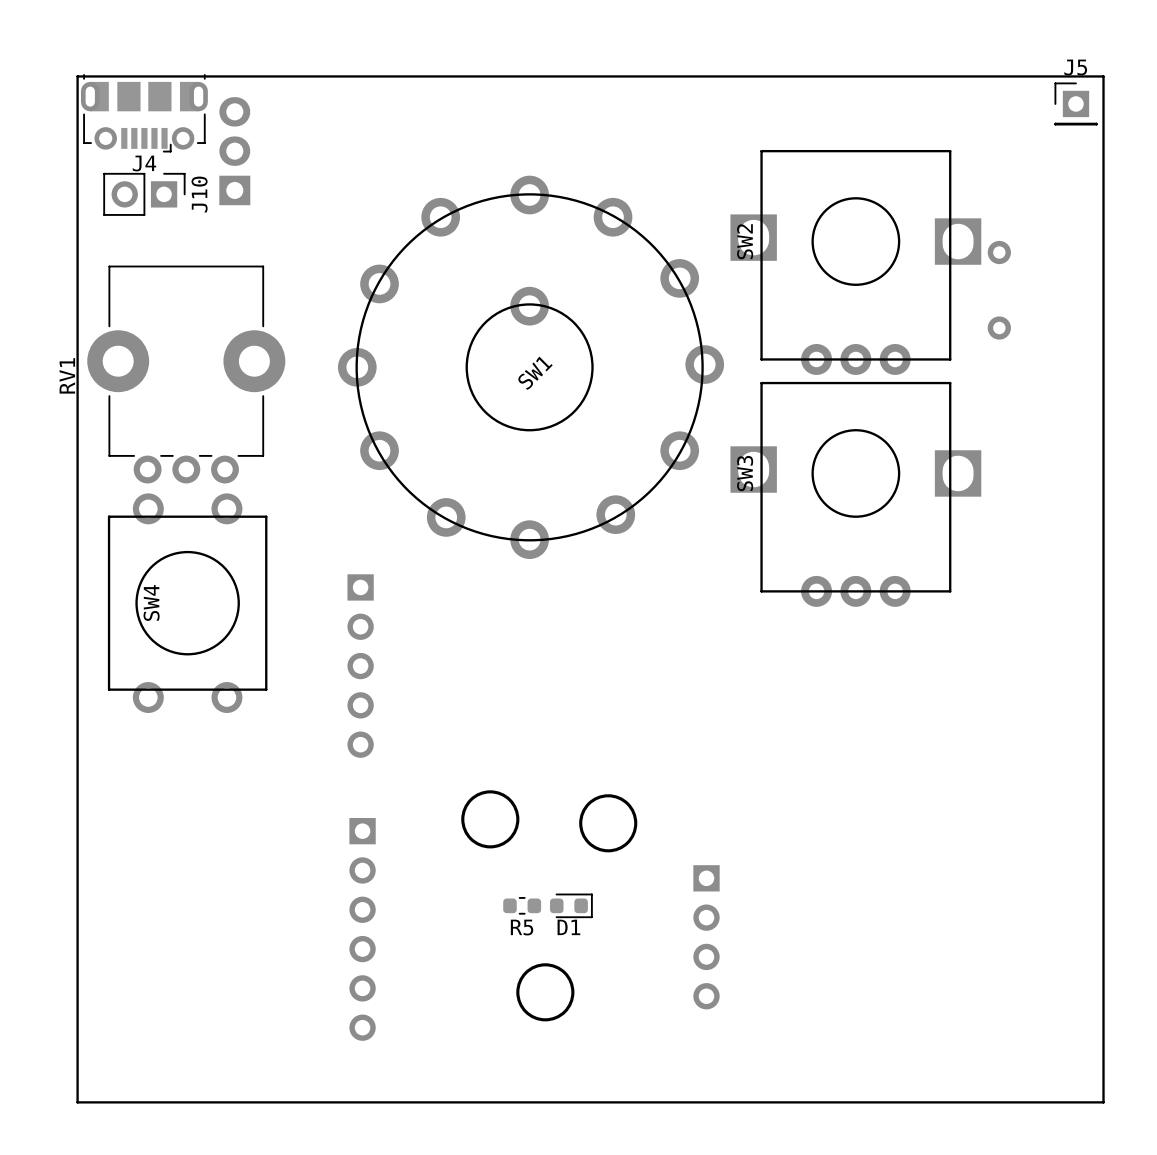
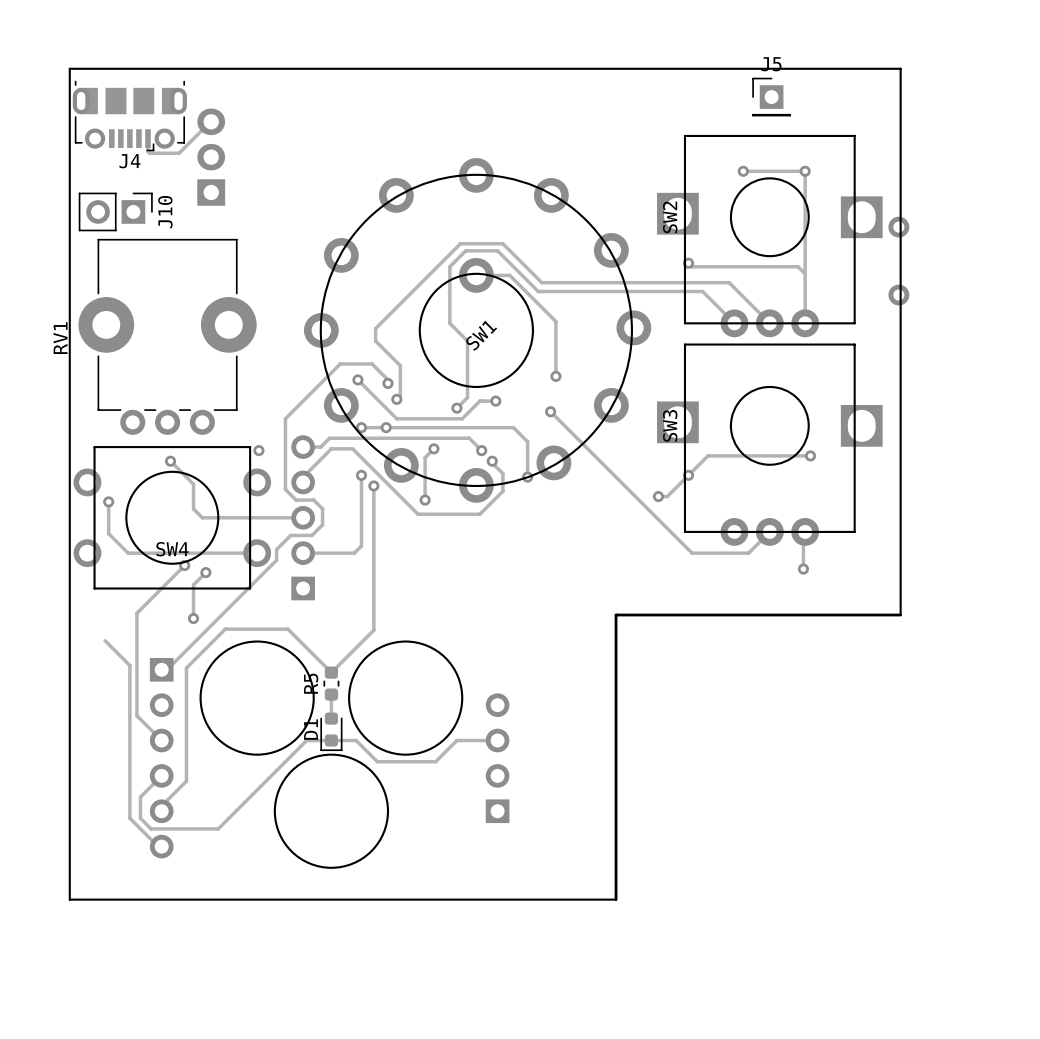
board edge: (1001, 76) (1103, 76) (1103, 1102) (77, 1102) (77, 1000) -> (900, 68) (900, 615) (616, 615) (616, 899) (69, 899)
J5 position: (1075, 103) -> (771, 97)
J4 position: (144, 113) -> (129, 116)
track: none -> (211, 121) (179, 153) (149, 153) (147, 151) (147, 138)
part position: (234, 151) -> (211, 157)
track: none -> (743, 171) (805, 171) (805, 323)
via: none -> (743, 171)
via: none -> (805, 171)
J10 position: (144, 194) -> (115, 211)
track: none -> (688, 263) (692, 266) (798, 266) (805, 273)
via: none -> (688, 263)
track: none -> (476, 275) (509, 275) (555, 321) (555, 376)
track: none -> (734, 323) (702, 291) (538, 291) (497, 250) (465, 250) (449, 266) (449, 323) (467, 341) (467, 397) (456, 408)
track: none -> (769, 323) (729, 282) (541, 282) (502, 243) (460, 243) (375, 328) (375, 341) (400, 365) (400, 395) (396, 399)
via: none -> (555, 376)
track: none -> (357, 379) (396, 418) (462, 418) (479, 401) (495, 401)
via: none -> (357, 379)
track: none -> (386, 381) (387, 383) (387, 379) (372, 363) (340, 363) (285, 418) (285, 489) (296, 500) (313, 500) (322, 508) (322, 524) (311, 535) (290, 535) (276, 549) (276, 560) (167, 669) (161, 669)
via: none -> (387, 383)
via: none -> (396, 399)
via: none -> (495, 401)
via: none -> (456, 408)
track: none -> (550, 411) (692, 553) (748, 553) (769, 531)
via: none -> (550, 411)
track: none -> (361, 427) (513, 427) (527, 441) (527, 477)
via: none -> (361, 427)
via: none -> (386, 427)
track: none -> (303, 447) (320, 447) (329, 438) (469, 438) (481, 450)
track: none -> (433, 448) (425, 457) (425, 500)
via: none -> (433, 448)
via: none -> (258, 450)
via: none -> (481, 450)
track: none -> (810, 455) (707, 455) (667, 496) (658, 496)
via: none -> (810, 455)
track: none -> (170, 461) (193, 484) (193, 508) (202, 517) (303, 517)
via: none -> (170, 461)
track: none -> (492, 461) (502, 473) (502, 491) (479, 514) (418, 514) (352, 448) (331, 448) (303, 477) (303, 482)
via: none -> (492, 461)
track: none -> (361, 475) (361, 546) (354, 553) (303, 553)
via: none -> (361, 475)
via: none -> (688, 475)
via: none -> (527, 477)
track: none -> (373, 485) (373, 630) (331, 672) (287, 629) (225, 629) (186, 668) (186, 781) (161, 805) (161, 811)
via: none -> (373, 485)
via: none -> (658, 496)
via: none -> (425, 500)
track: none -> (108, 501) (108, 533) (128, 553) (257, 553)
via: none -> (108, 501)
track: none -> (805, 531) (803, 533) (803, 569)
SW4 name position: SW4 (151, 602) -> SW4 (172, 549)
SW4 rotation: 0° (187, 603) -> 90° clockwise (172, 517)
track: none -> (184, 565) (136, 613) (136, 715) (161, 740)
via: none -> (184, 565)
via: none -> (803, 569)
track: none -> (205, 572) (193, 584) (193, 618)
via: none -> (205, 572)
part rotation: 0° (360, 666) -> 180° (303, 517)
via: none -> (193, 618)
track: none -> (105, 640) (129, 665) (129, 818) (158, 846) (161, 846)
round board edge: none -> [199, 640, 315, 756]
round board edge: none -> [348, 640, 464, 756]
track: none -> (331, 694) (331, 718)
drawing: [461, 790, 520, 849] -> none
drawing: [579, 794, 638, 853] -> none
track: none -> (501, 740) (456, 740) (435, 761) (377, 761) (356, 740) (306, 740) (218, 828) (151, 828) (140, 818) (140, 797) (161, 775)
round board edge: none -> [273, 753, 390, 869]
R5 rotation: 0° (522, 905) -> 90° clockwise (331, 683)
R5 position: (522, 905) -> (331, 683)
D1 rotation: 0° (571, 905) -> 90° clockwise (331, 731)
D1 position: (571, 905) -> (331, 731)
part position: (362, 929) -> (161, 758)
part rotation: 0° (706, 937) -> 180° (497, 758)
part position: (706, 937) -> (497, 758)
drawing: [516, 963, 575, 1022] -> none

